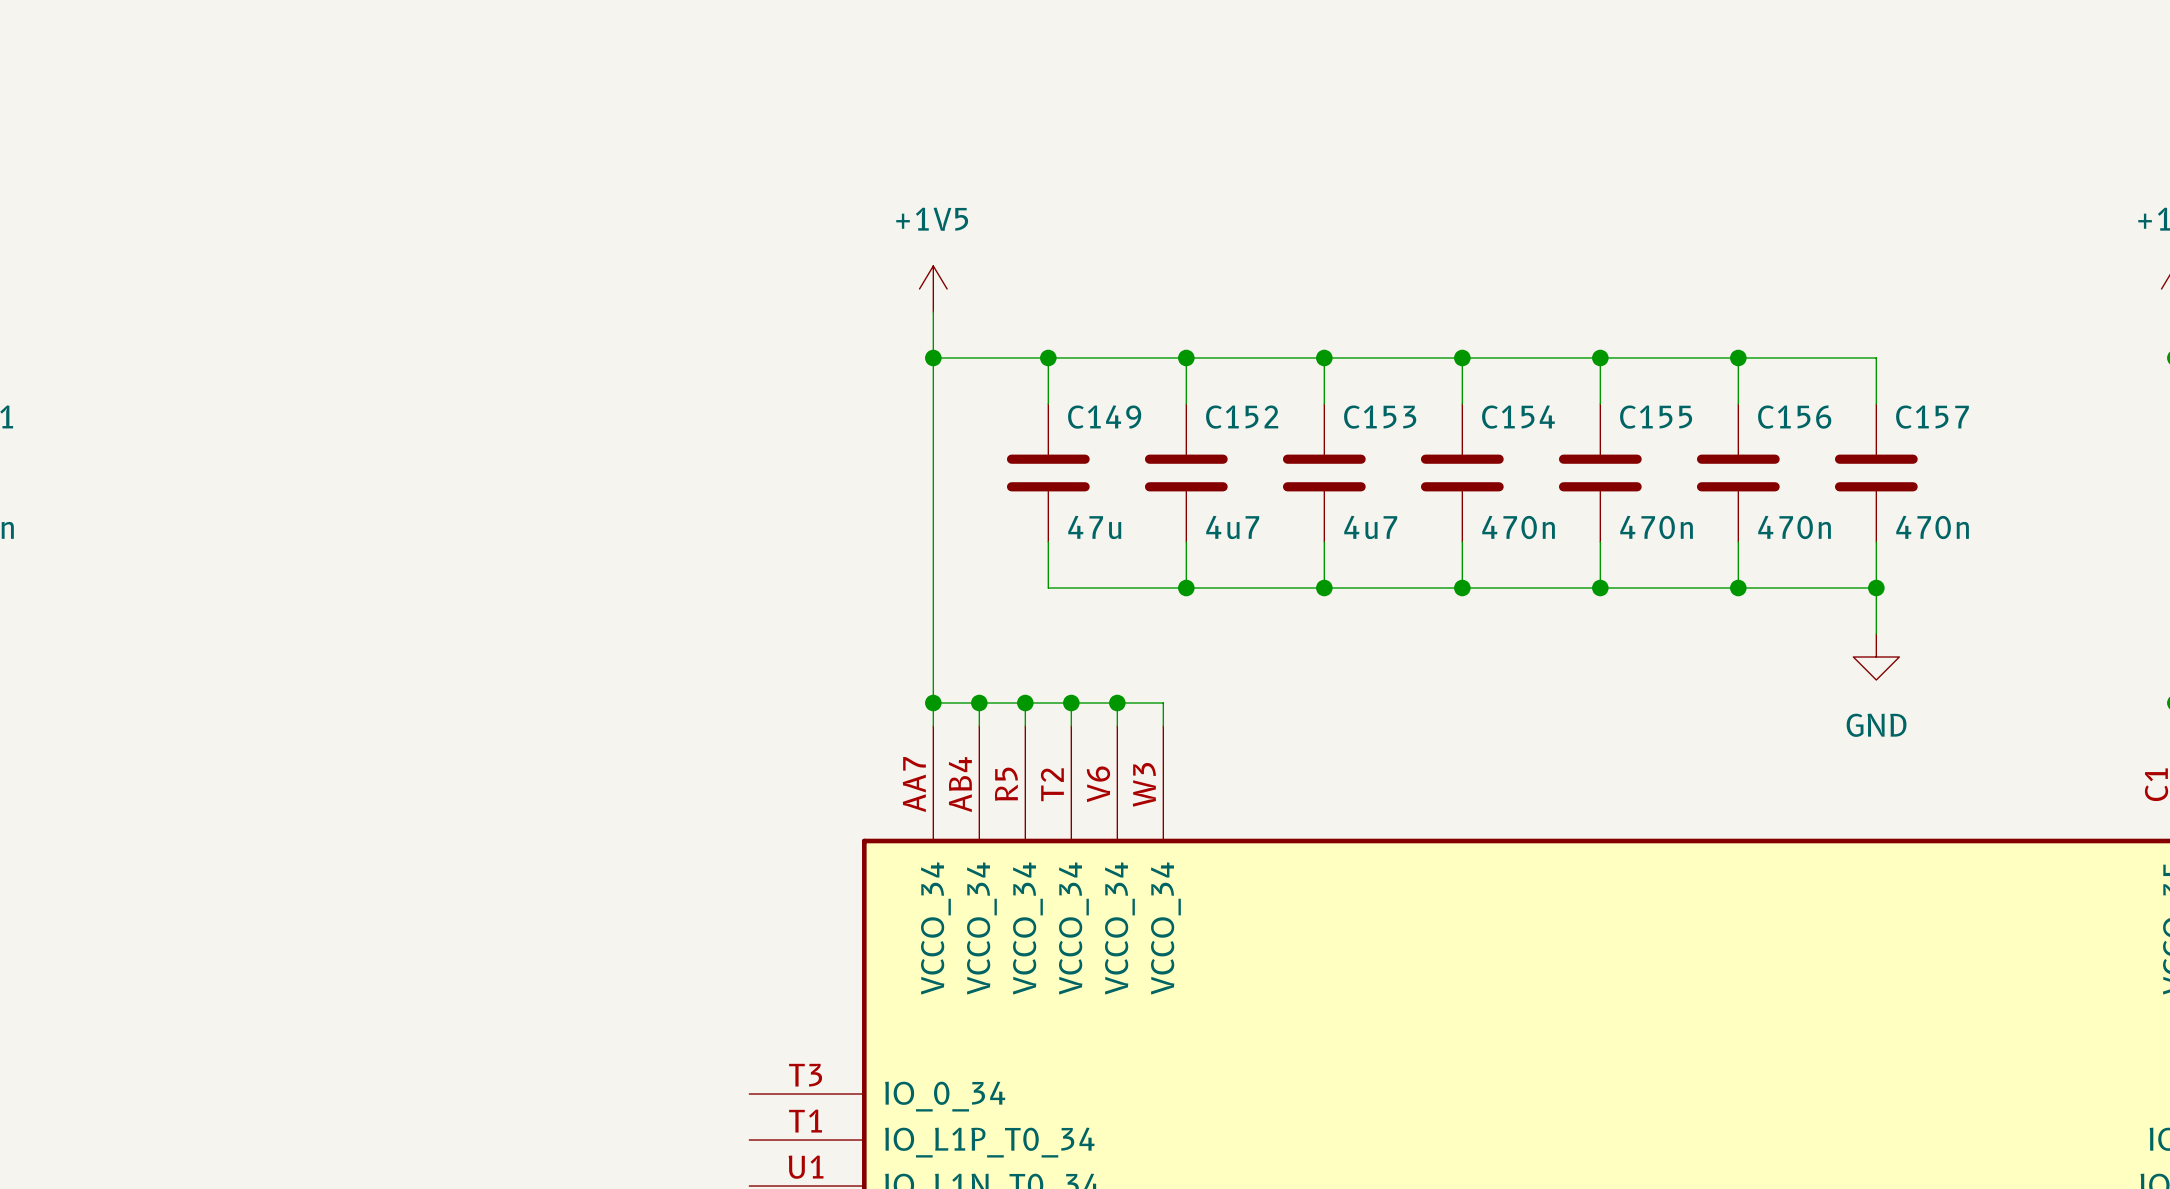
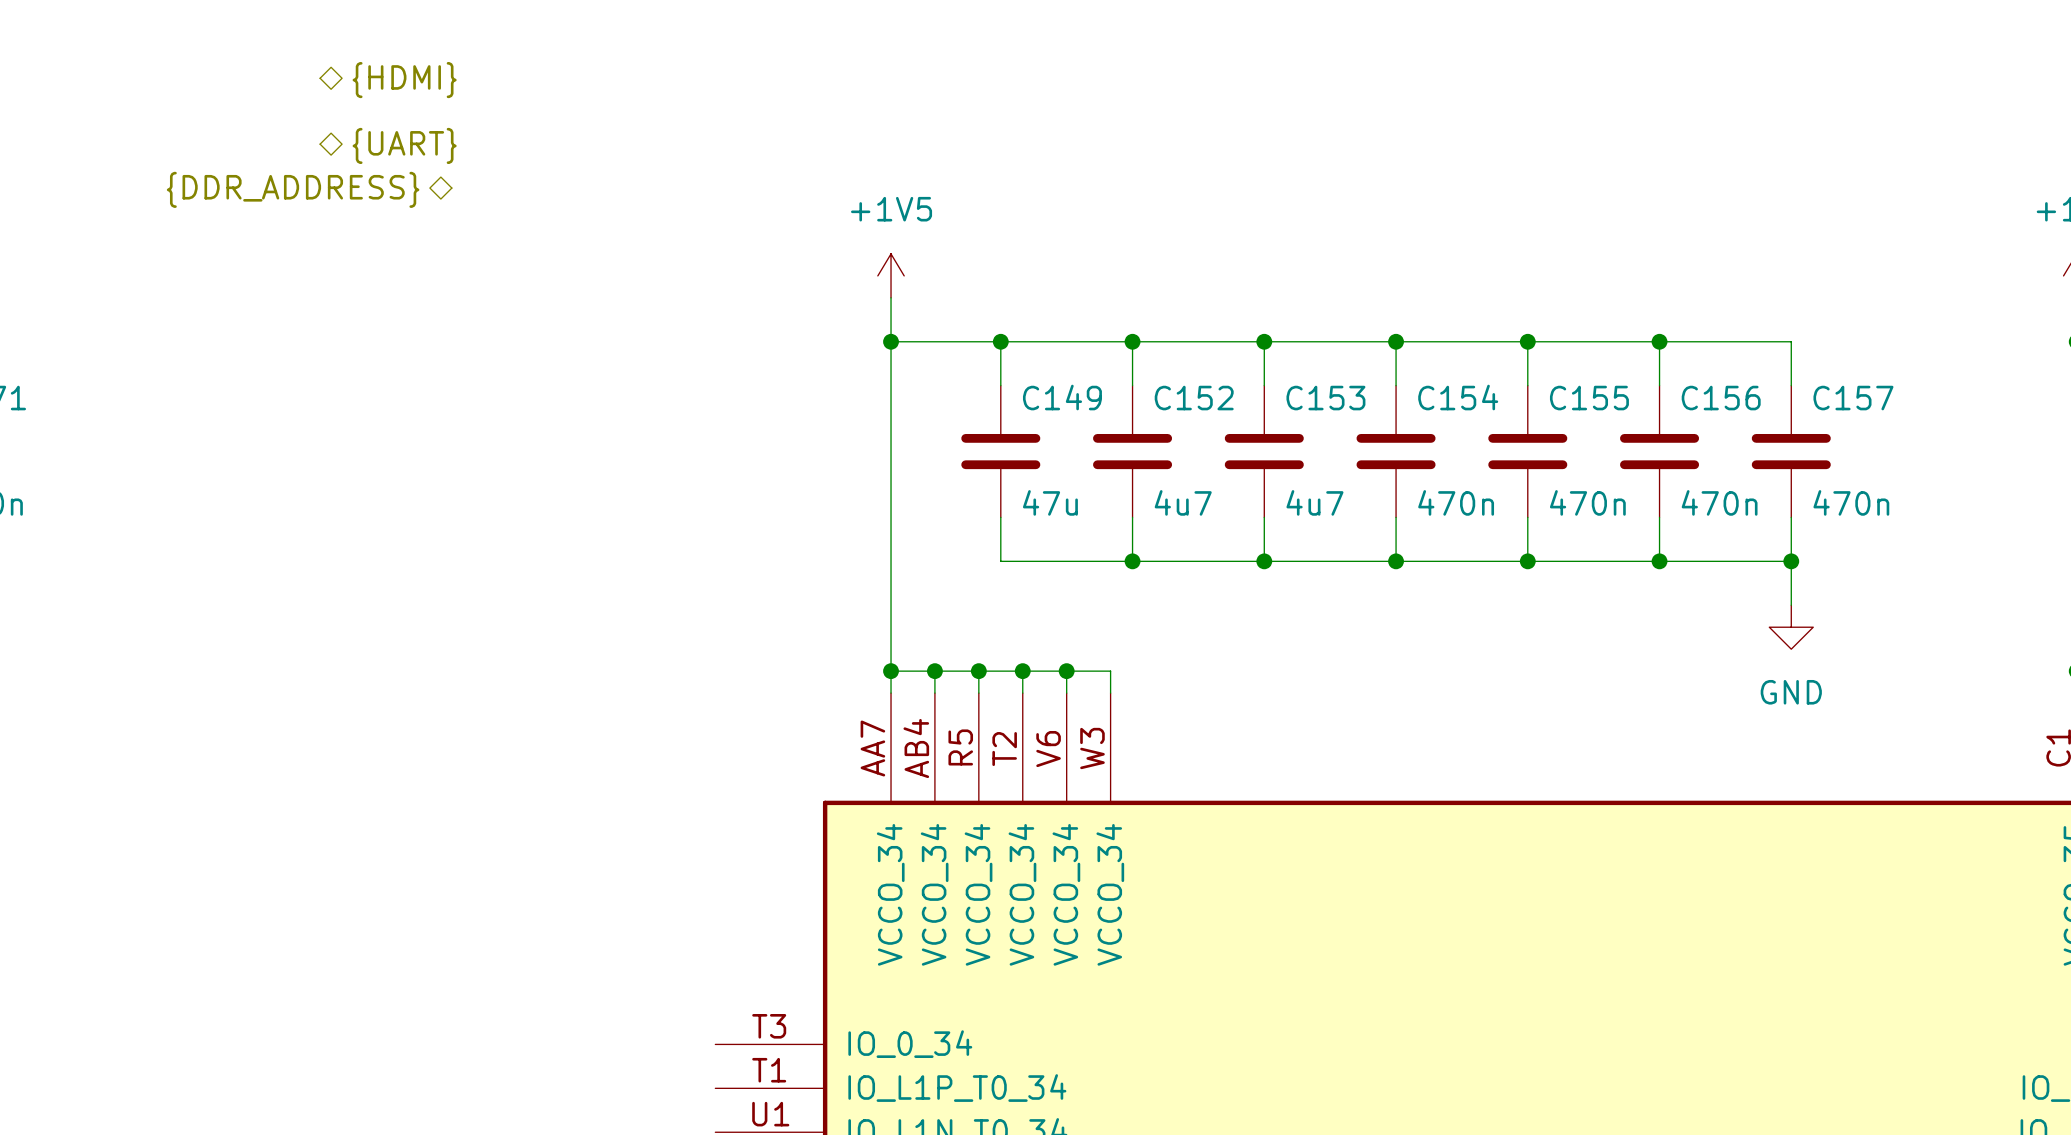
hierarchical label: none -> {HDMI} (404, 80)
hierarchical label: none -> {UART} (404, 145)
hierarchical label: none -> {DDR_ADDRESS} (293, 189)

